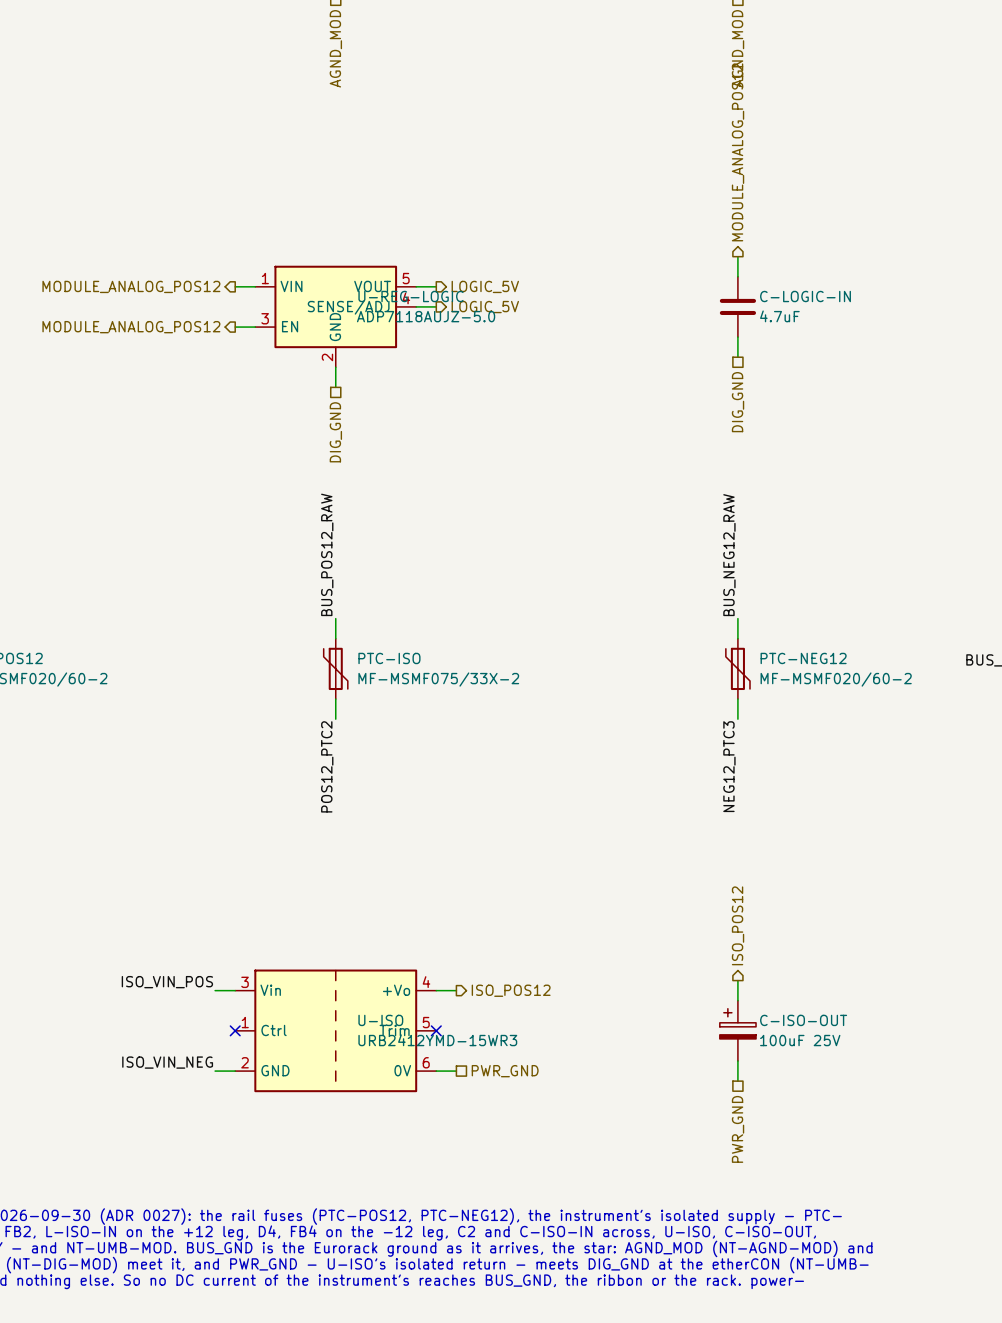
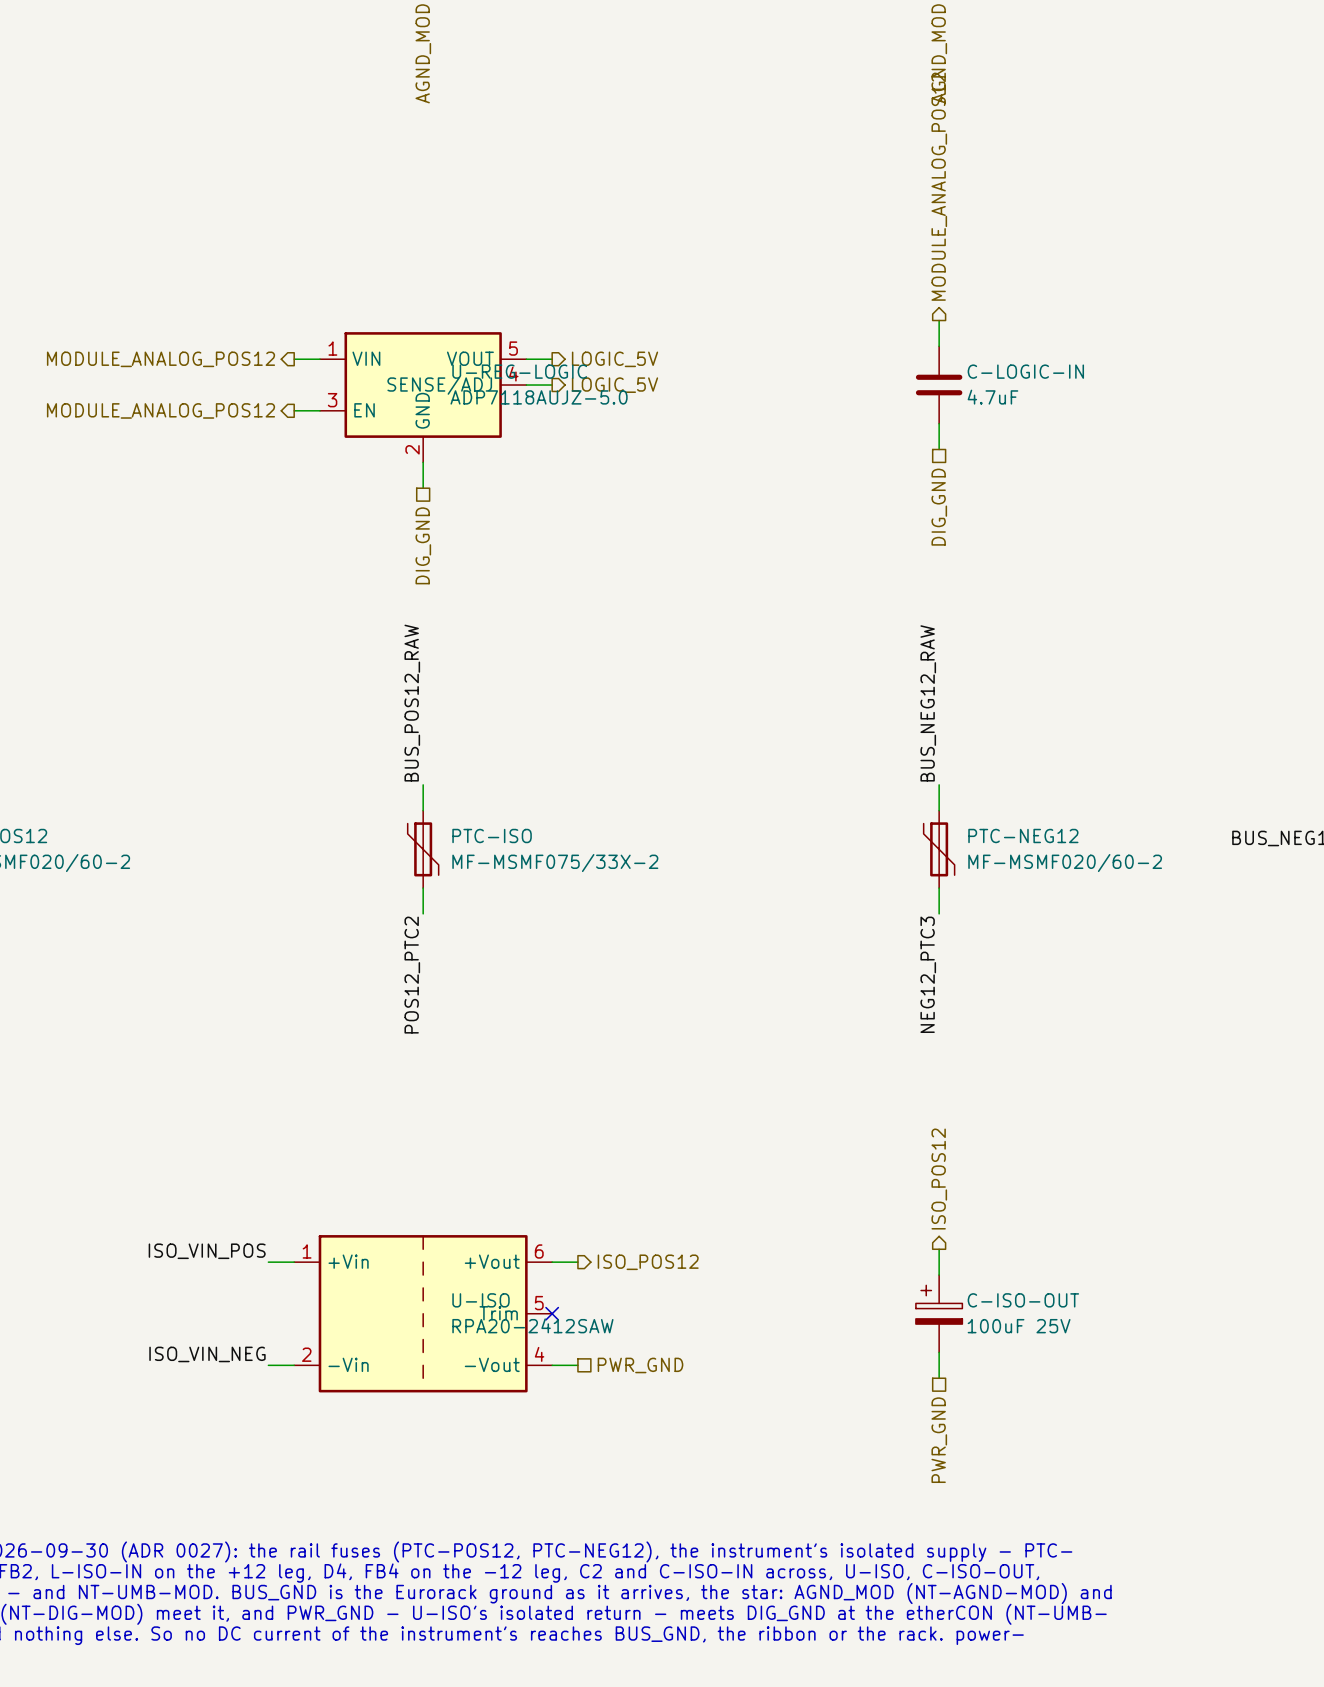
U-ISO symbol: [235, 969, 437, 1093] -> [294, 1235, 553, 1393]
no-connect mark: (235, 1030) -> none
U-ISO value: URB2412YMD-15WR3 (437, 1040) -> RPA20-2412SAW (532, 1325)

